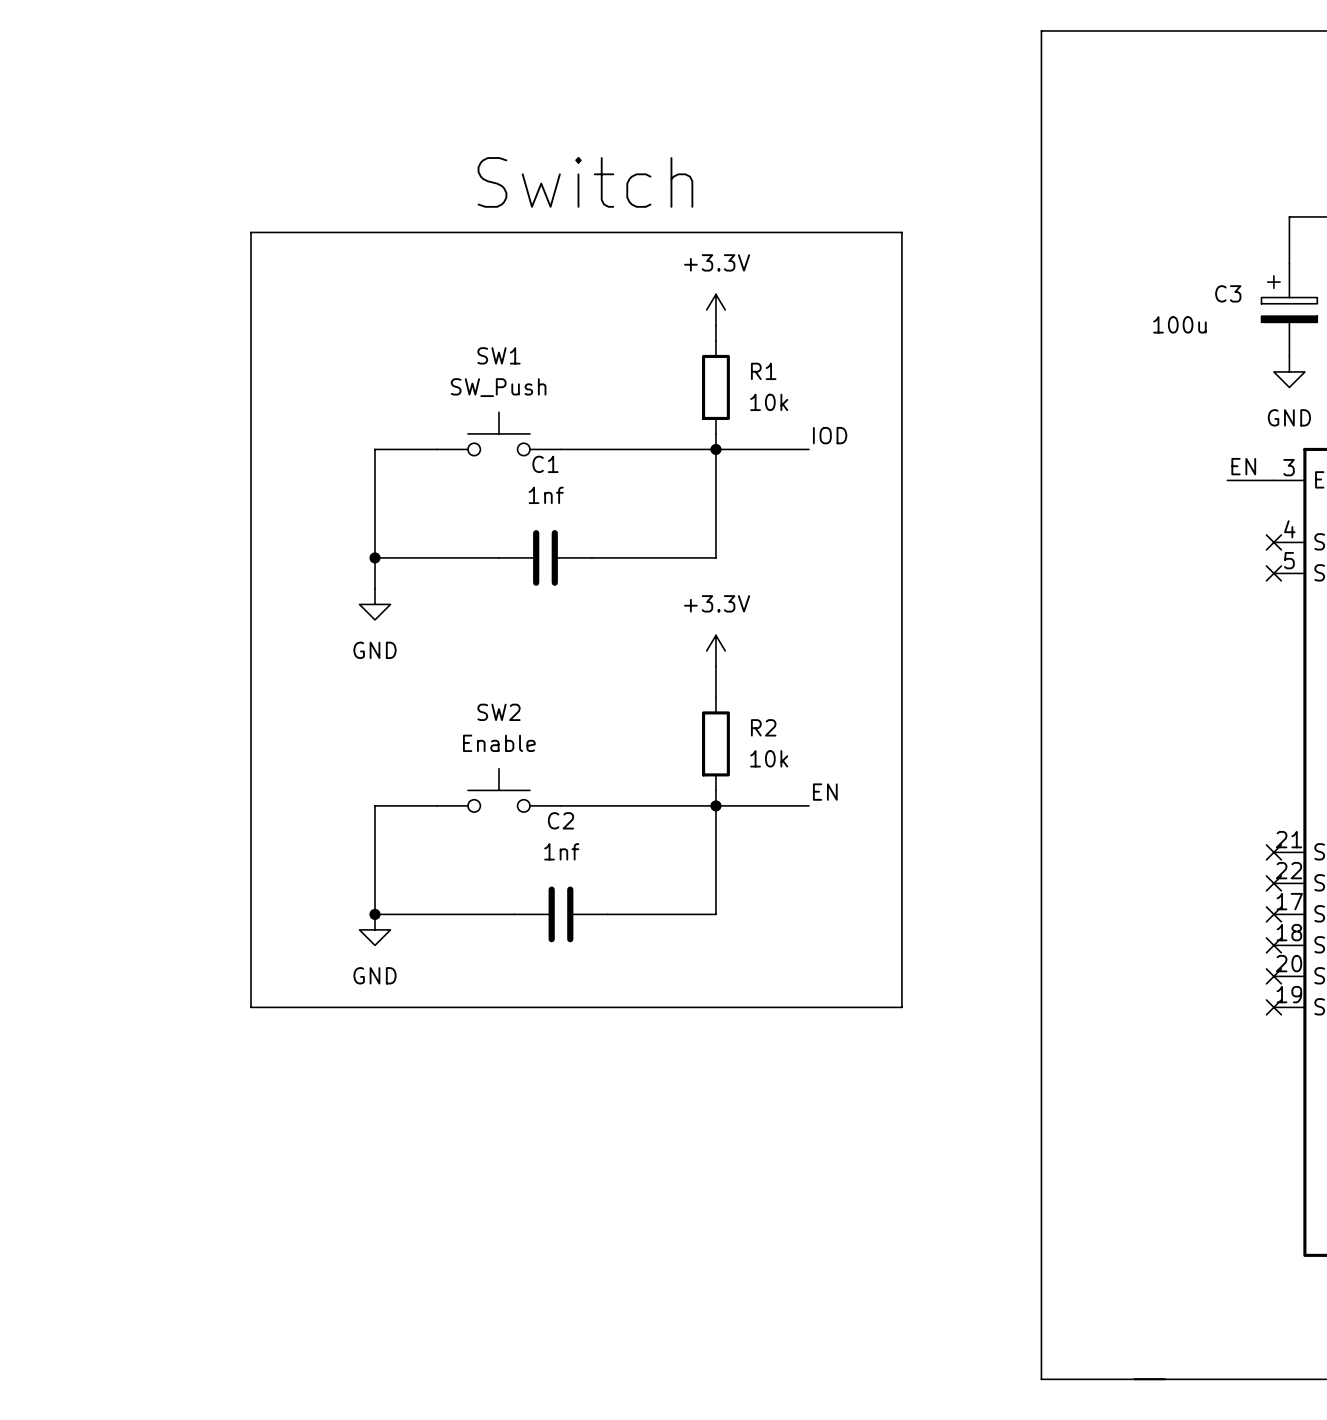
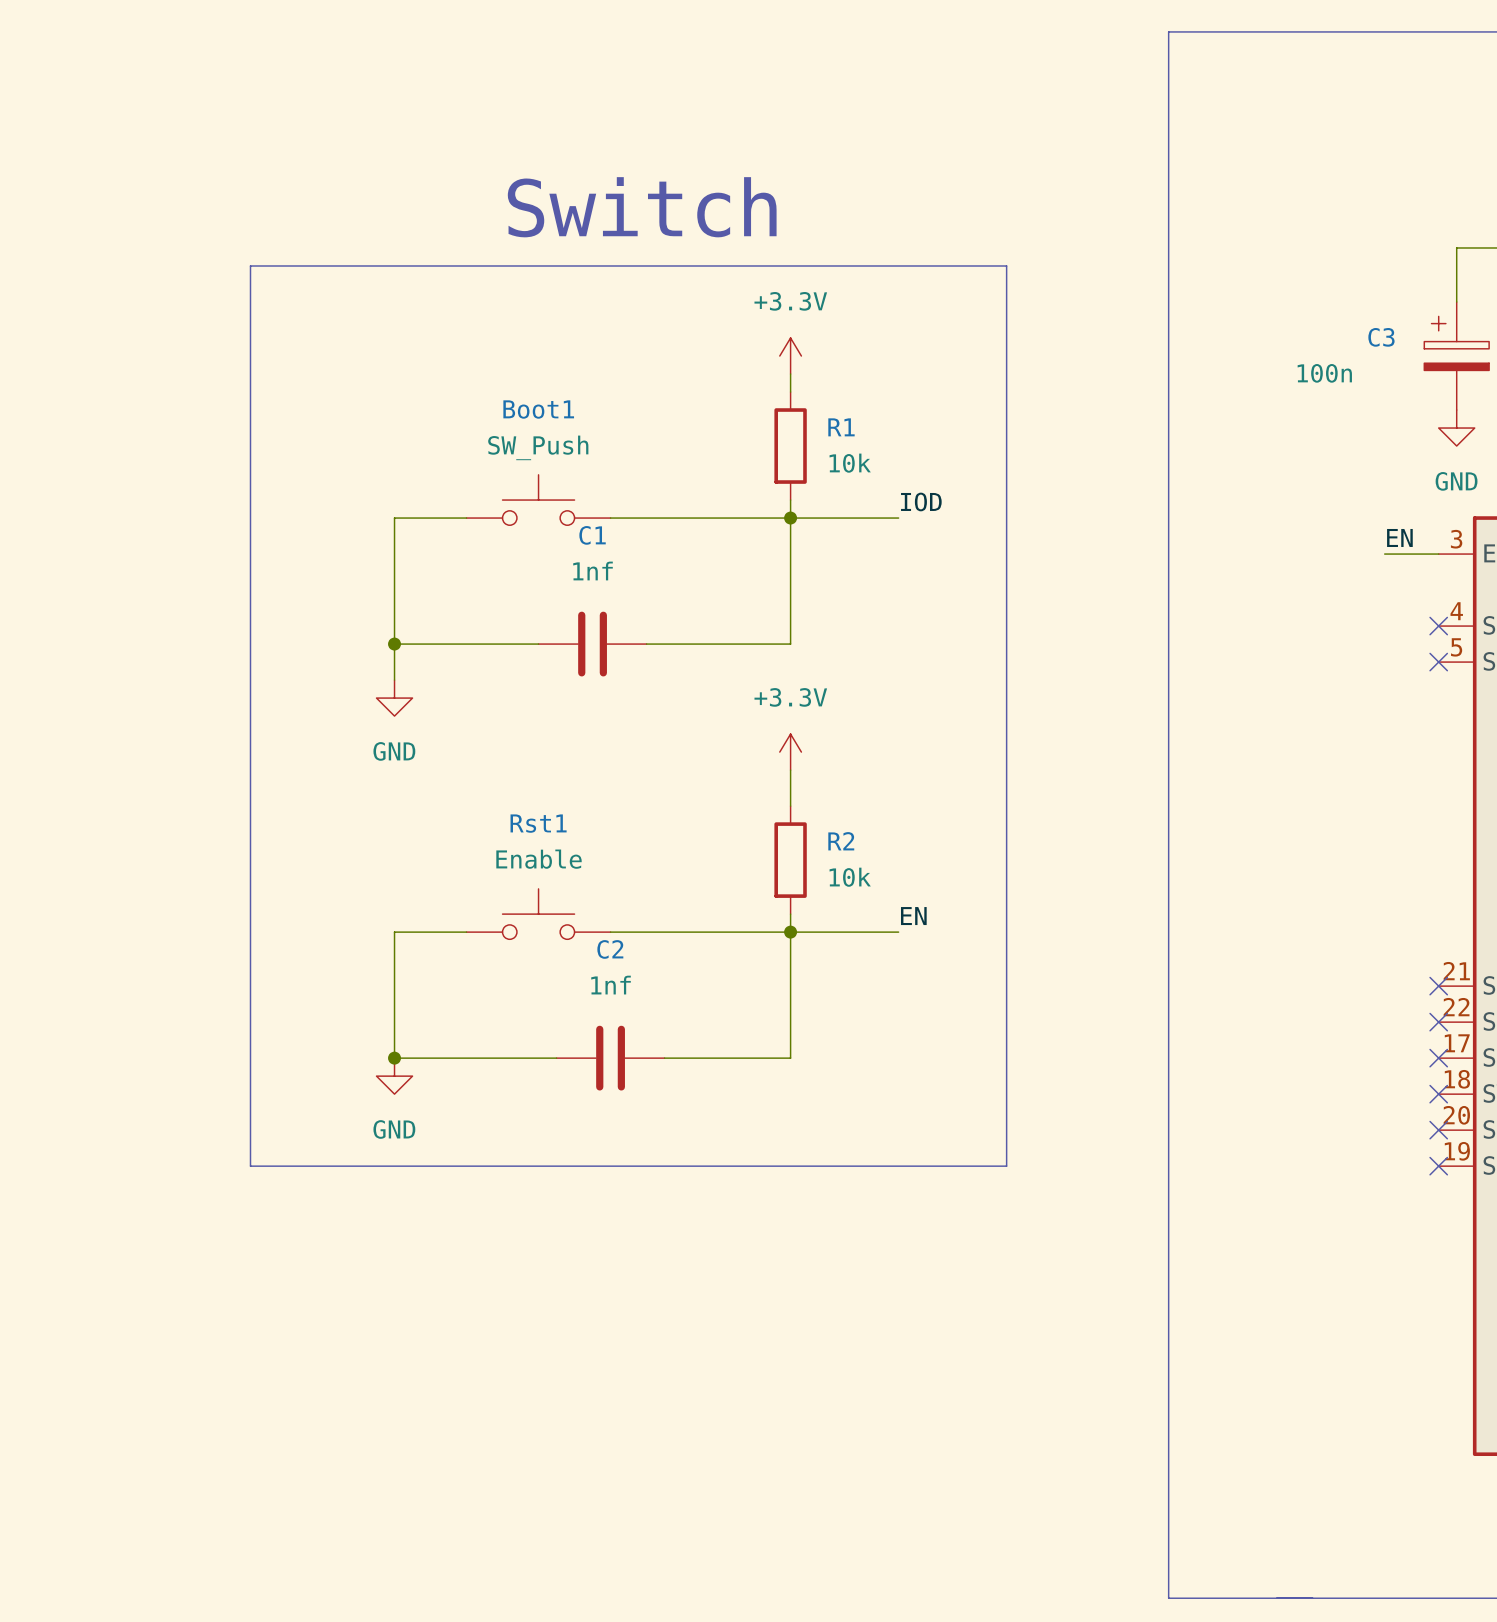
C3 value: 100u (1179, 324) -> 100n (1324, 373)
SW1 name: SW1 (498, 355) -> Boot1 (538, 409)
SW2 name: SW2 (498, 712) -> Rst1 (538, 823)

